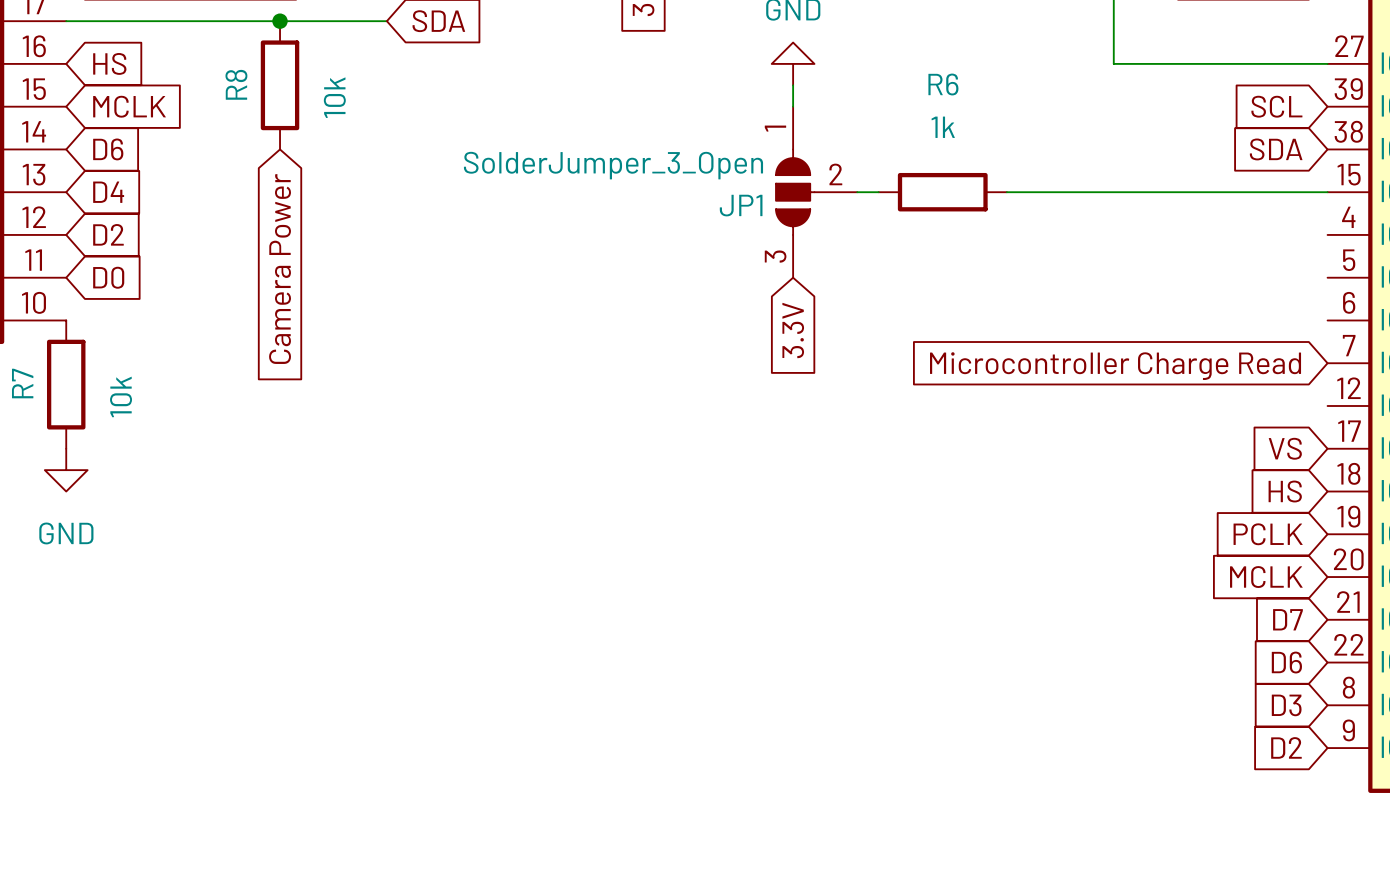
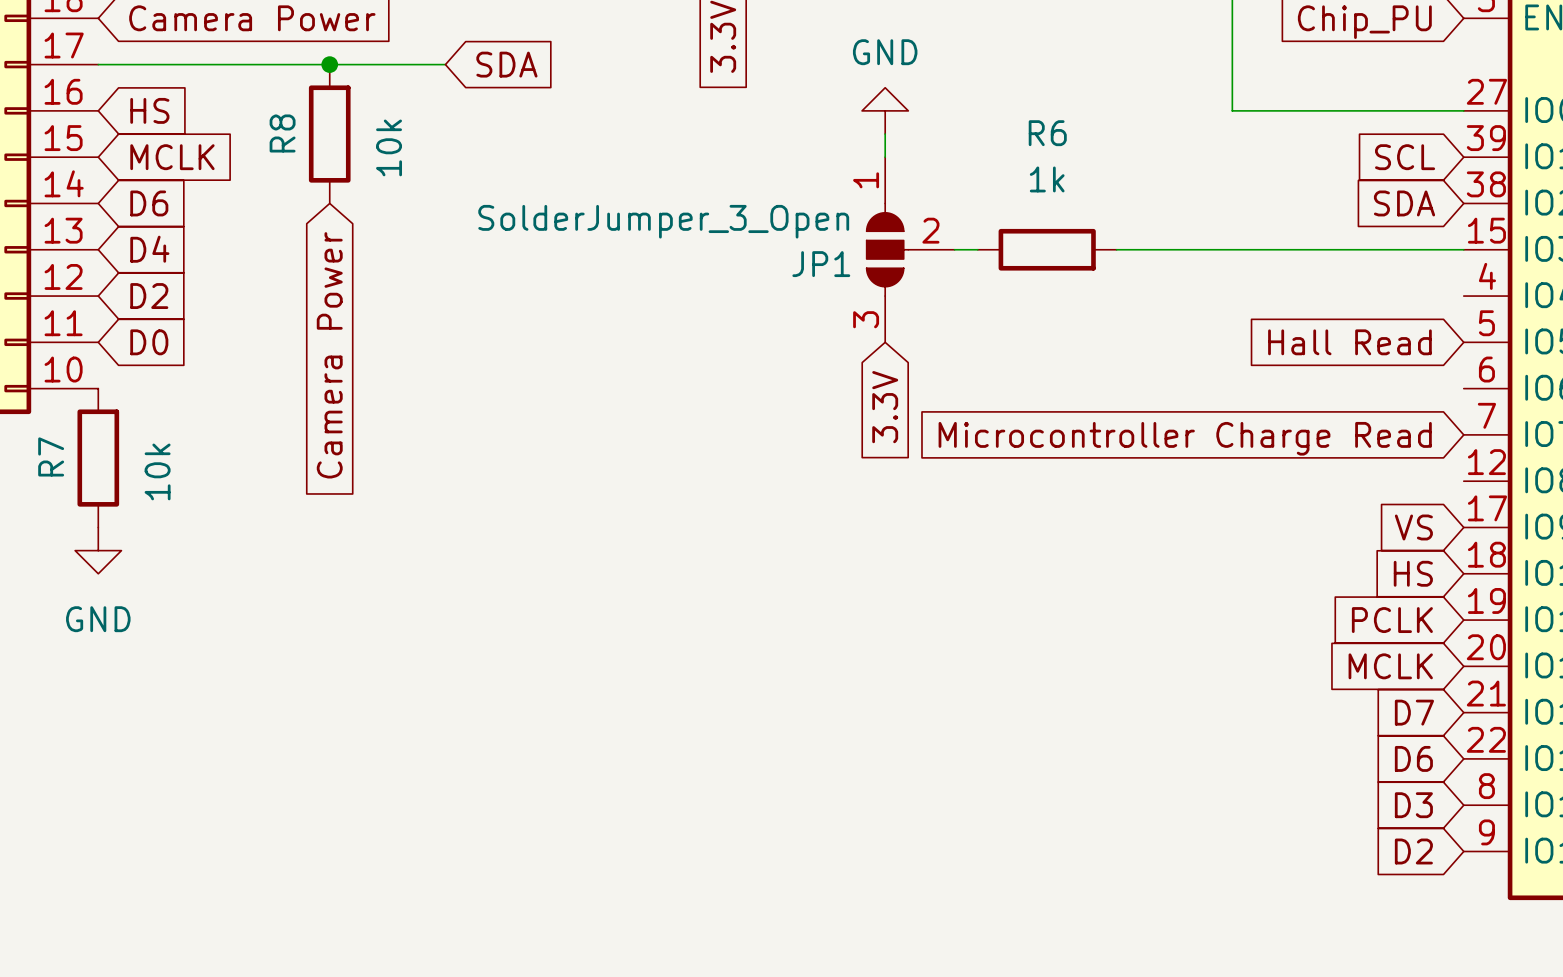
global label: none -> Hall Read (1349, 342)

